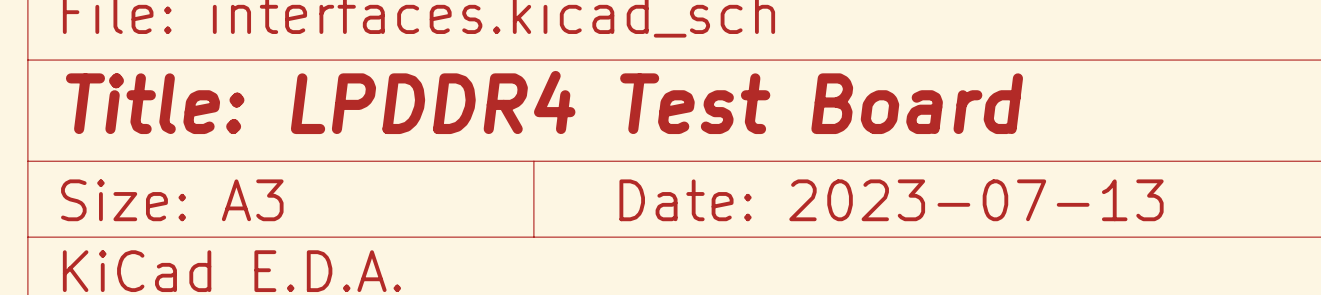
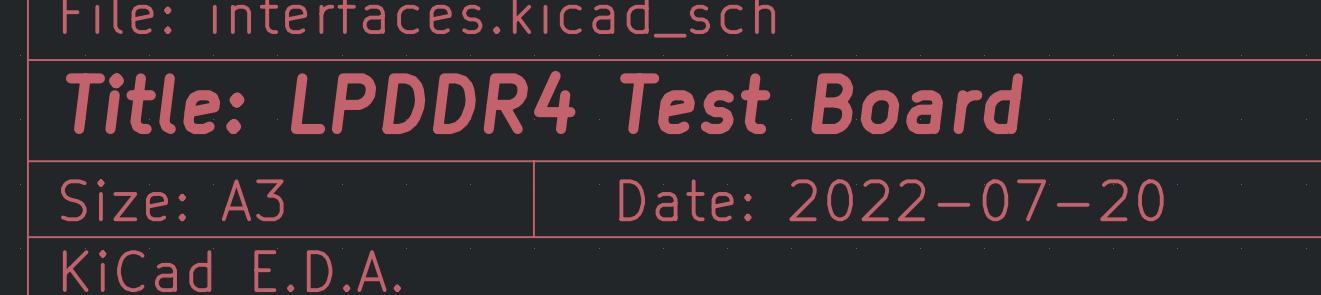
title block: Date: 2023-07-13 (891, 200) -> Date: 2022-07-20 (891, 200)

